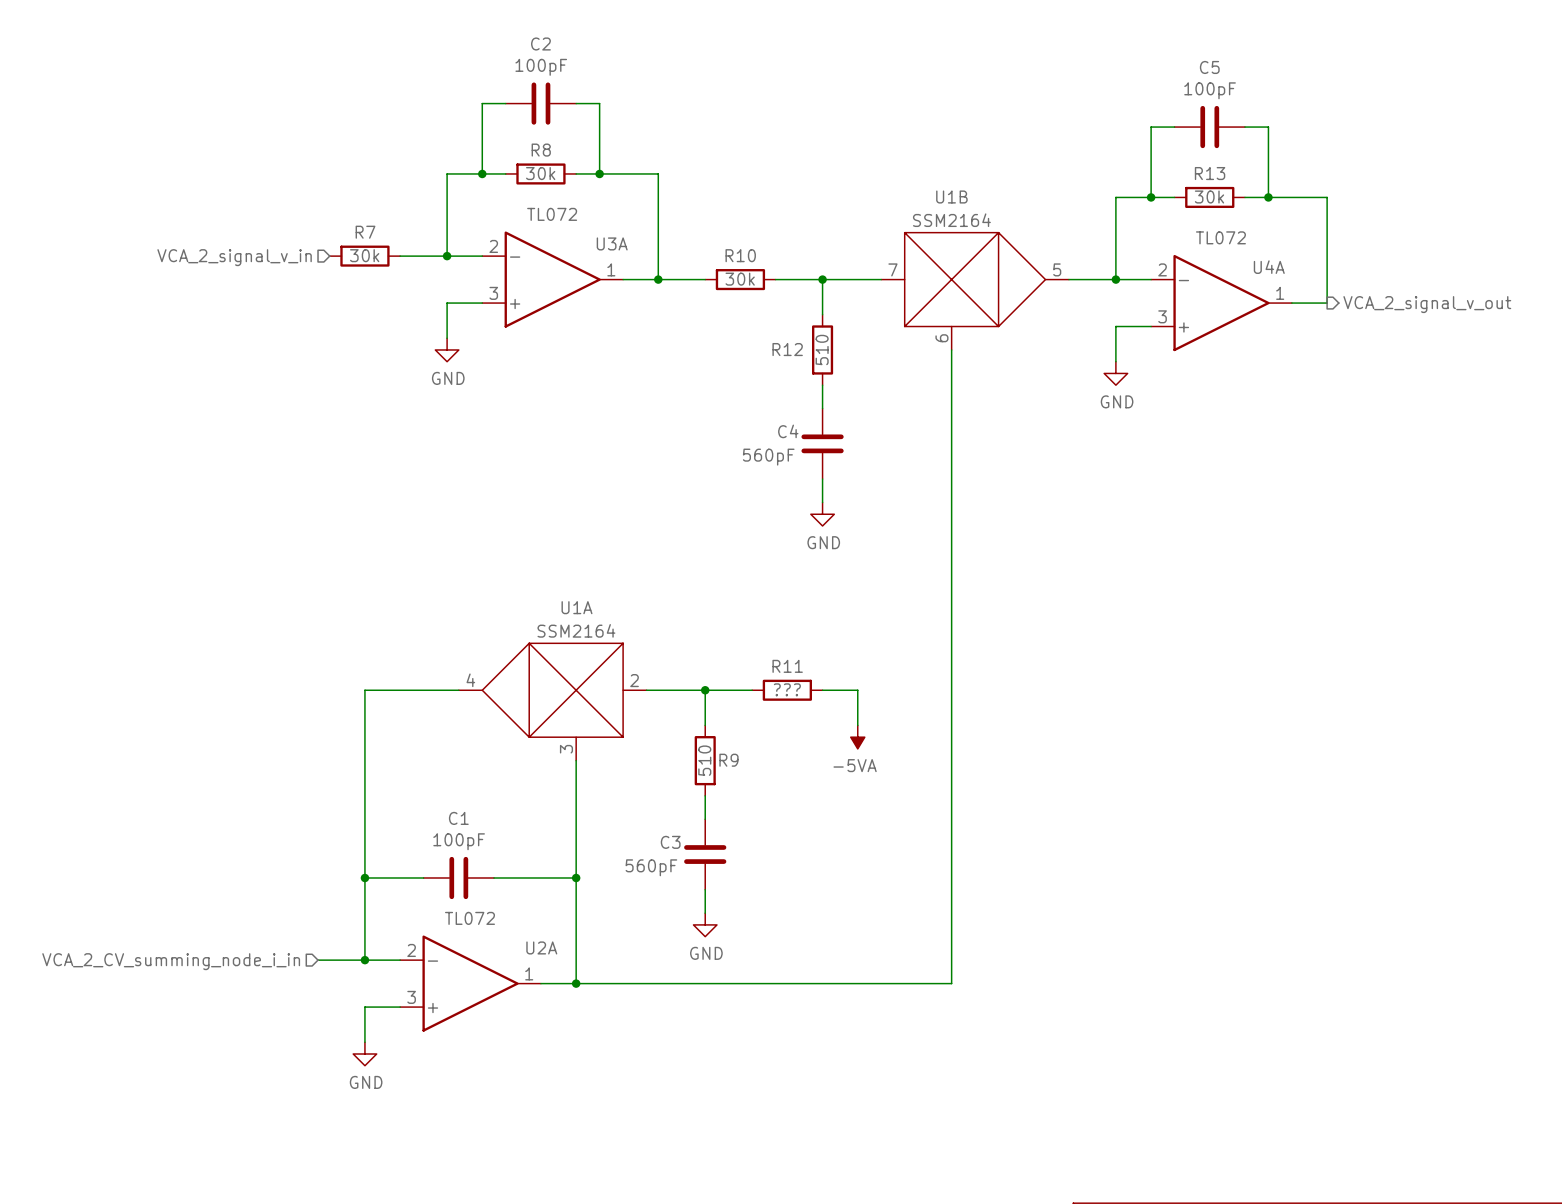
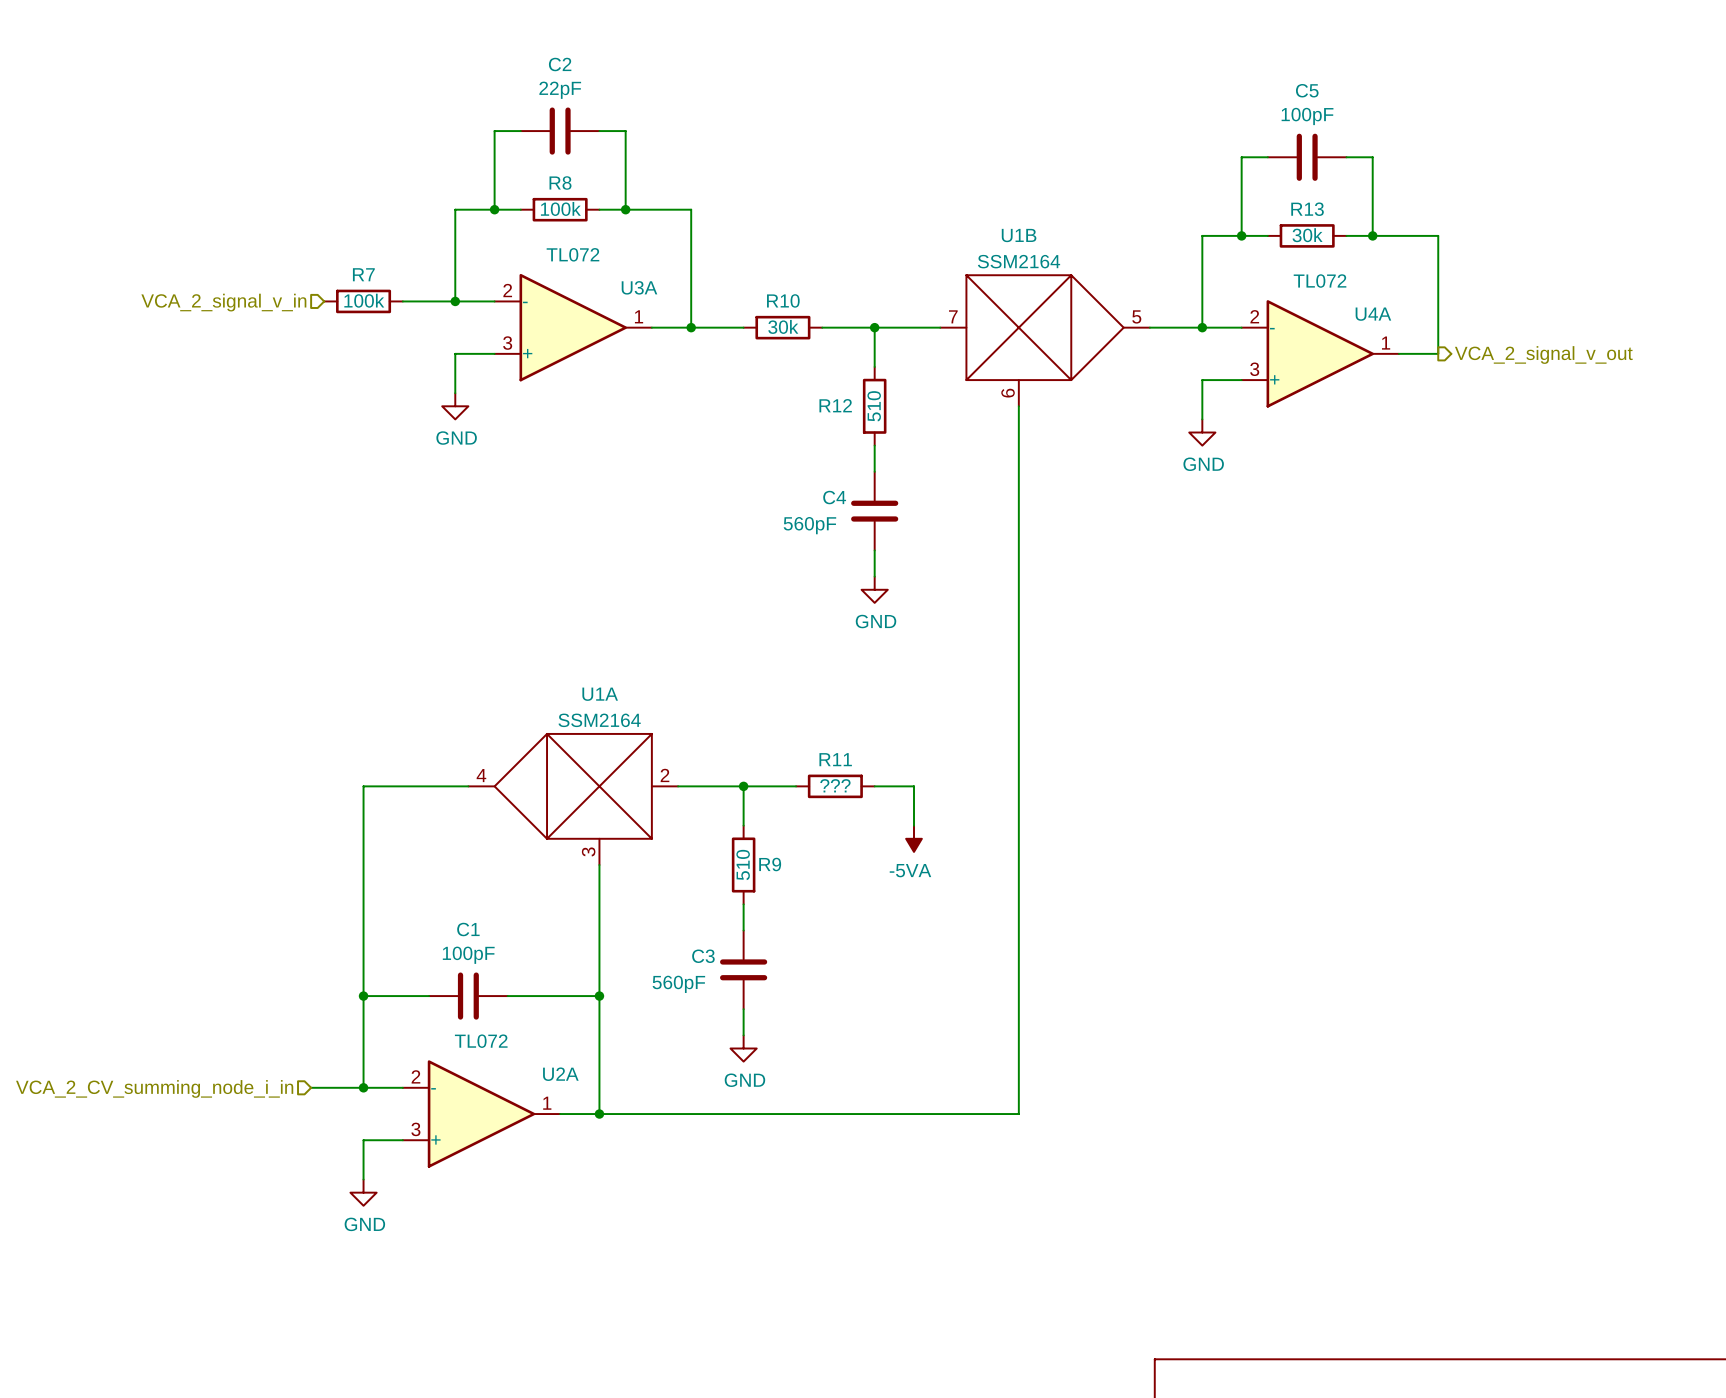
C2 value: 100pF (541, 67) -> 22pF (560, 90)
R8 value: 30k (540, 173) -> 100k (560, 208)
R7 value: 30k (364, 255) -> 100k (364, 300)

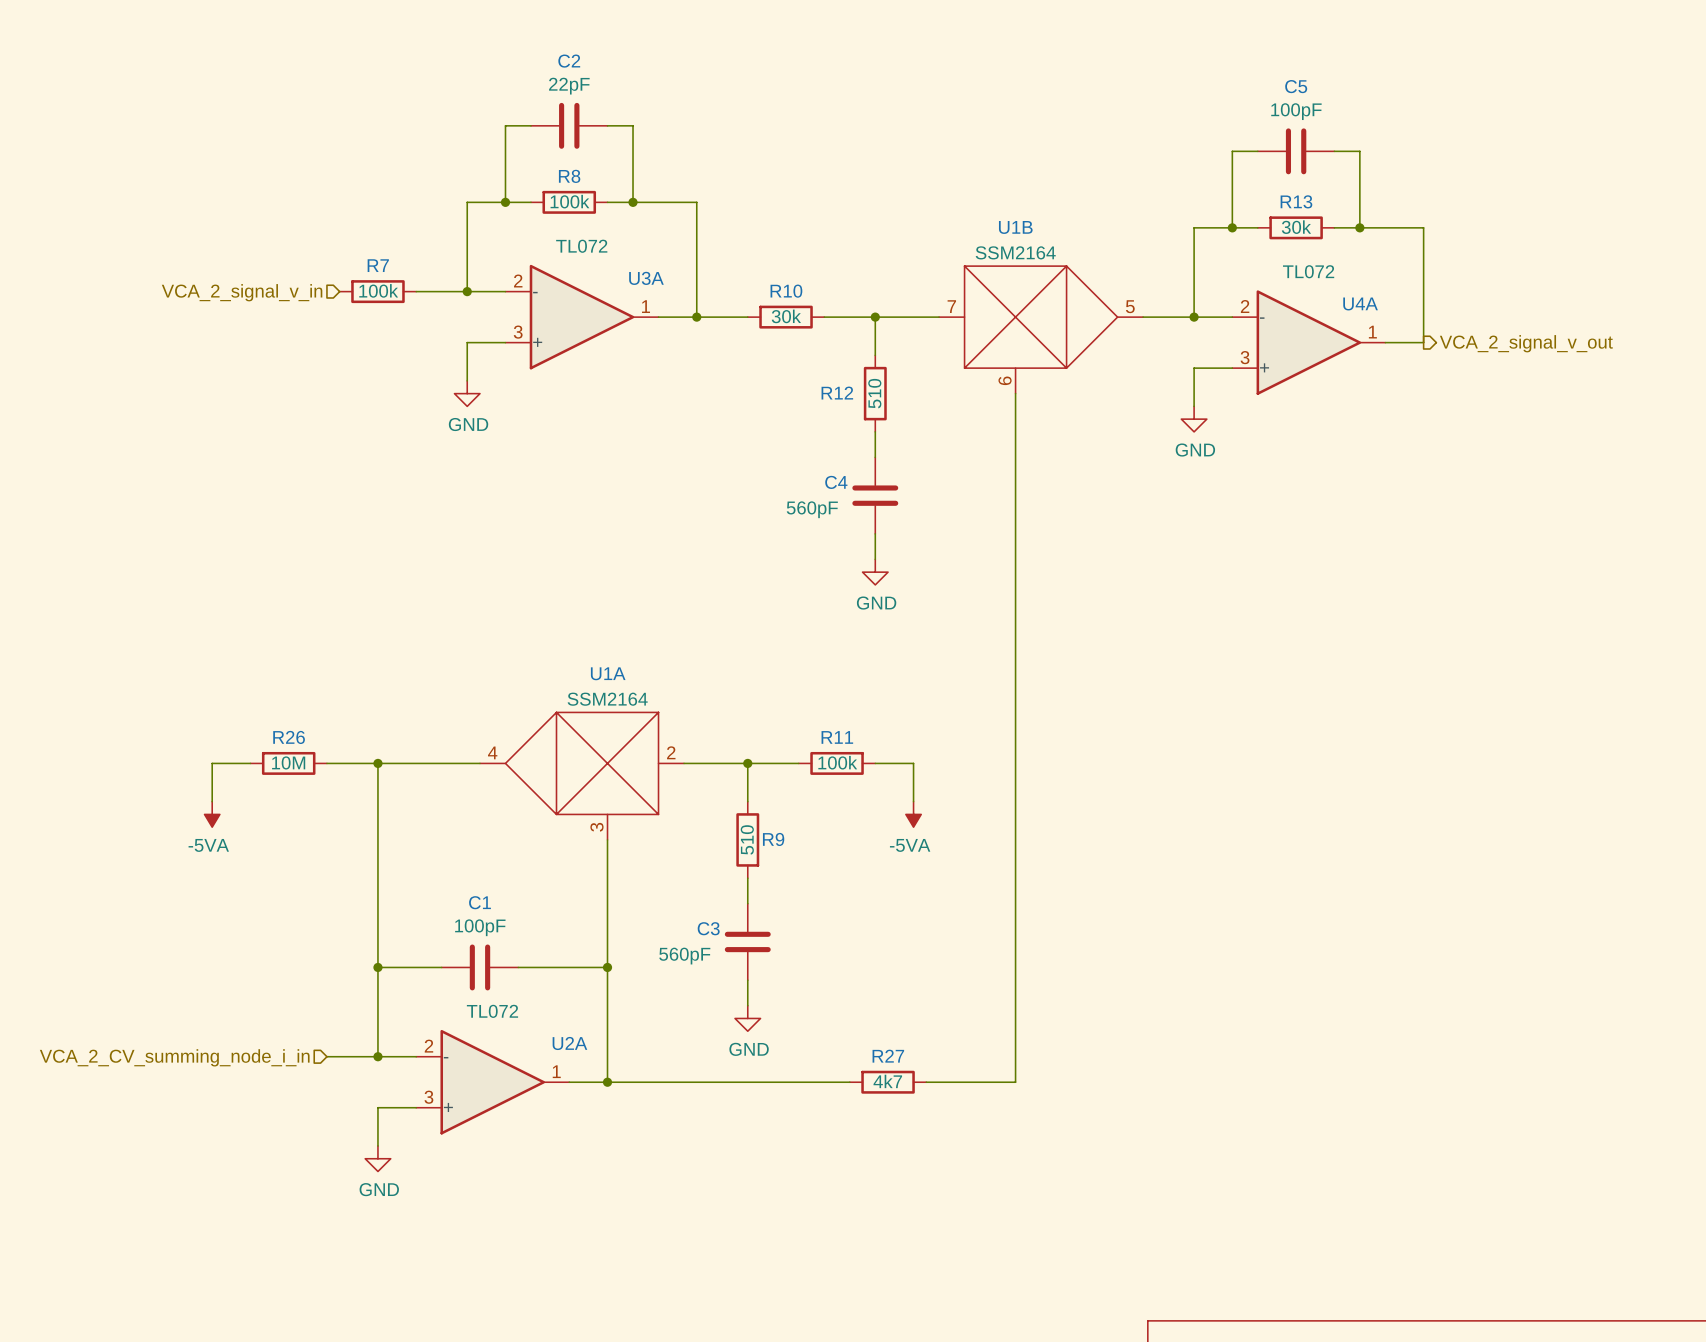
R11 value: ??? (835, 785) -> 100k (837, 762)
wire: none -> (250, 763) (212, 763) (212, 801)
R26: none -> 10M (288, 763)
wire: none -> (326, 763) (377, 763)
junction: none -> (377, 763)
power symbol: none -> -5VA (212, 814)
wire: (848, 1114) (927, 1114) -> none
R27: none -> 4k7 (888, 1082)

